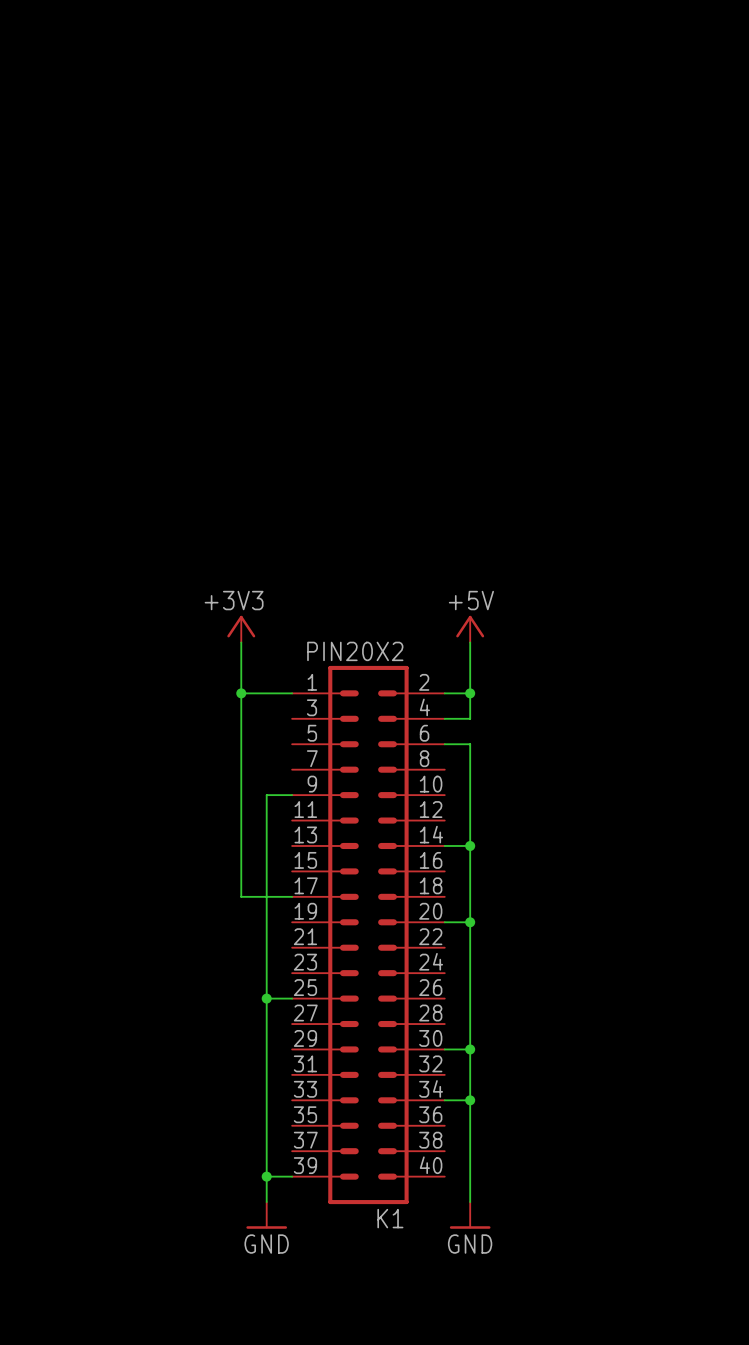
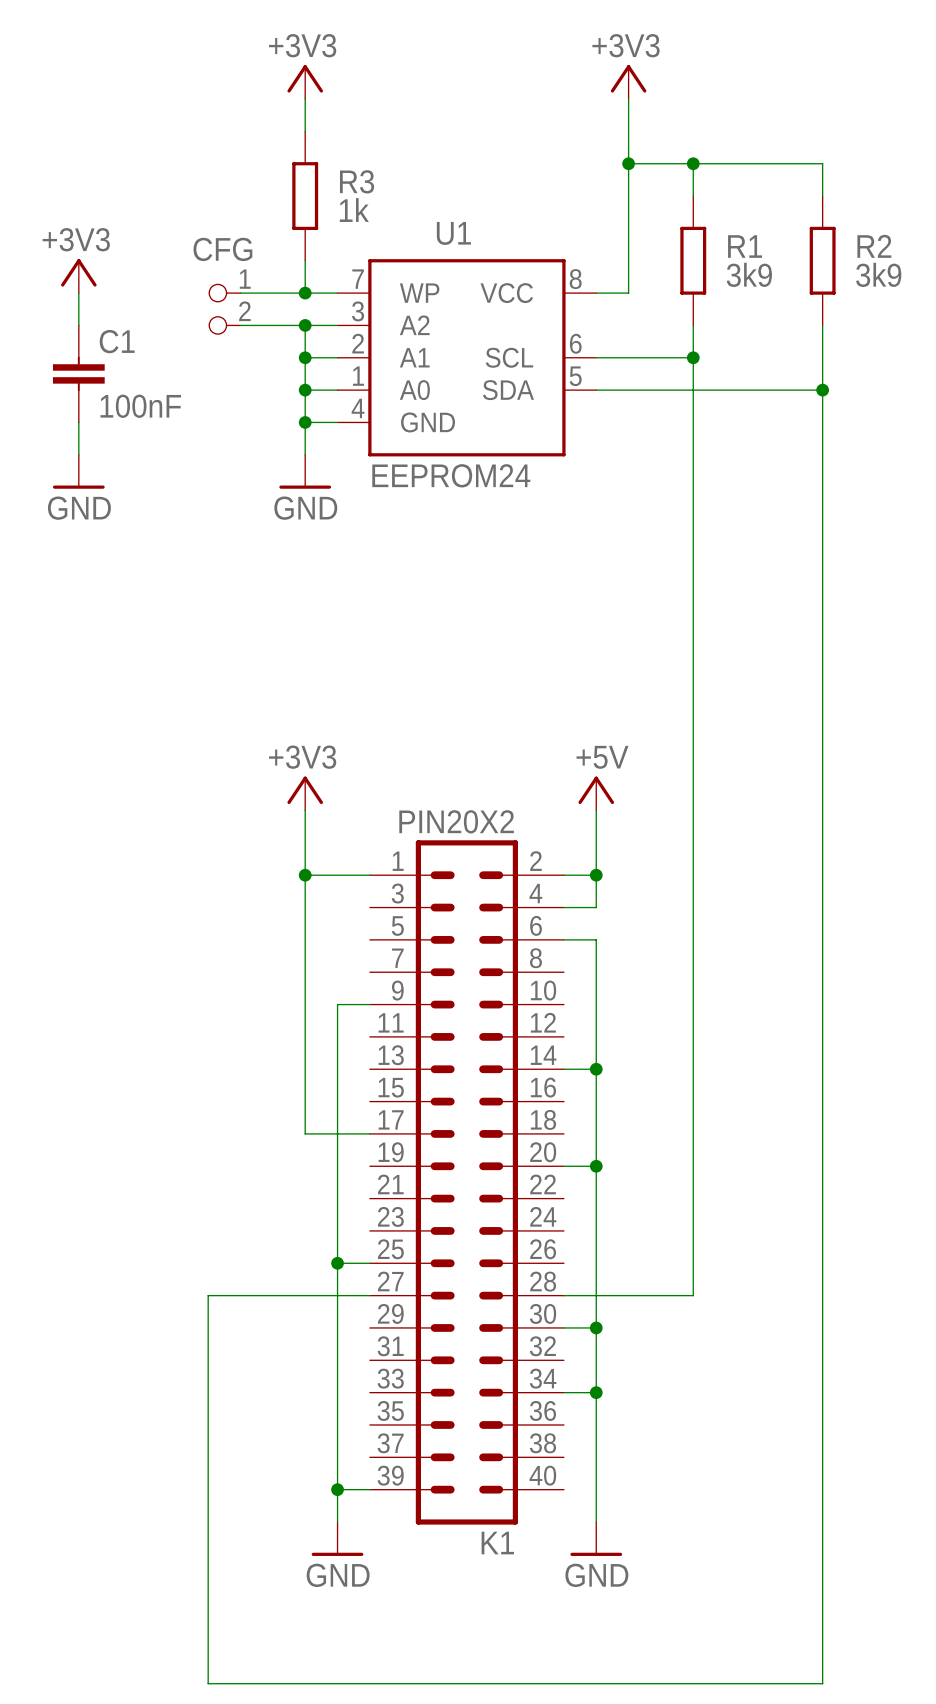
power symbol: none -> +3V3 (305, 82)
power symbol: none -> +3V3 (628, 82)
wire: none -> (305, 99) (305, 131)
wire: none -> (628, 99) (628, 293) (596, 293)
wire: none -> (628, 163) (822, 163) (822, 196)
junction: none -> (628, 163)
wire: none -> (693, 163) (693, 196)
junction: none -> (693, 163)
R3: none -> 1k (305, 196)
wire: none -> (305, 260) (305, 293)
R1: none -> 3k9 (693, 260)
R2: none -> 3k9 (822, 260)
power symbol: none -> +3V3 (78, 276)
wire: none -> (78, 293) (78, 325)
wire: none -> (240, 293) (337, 293)
junction: none -> (305, 293)
CFG: none -> (224, 309)
wire: none -> (240, 325) (337, 325)
wire: none -> (305, 325) (305, 454)
junction: none -> (305, 325)
wire: none -> (693, 325) (693, 1295) (563, 1295)
wire: none -> (822, 325) (822, 1683) (208, 1683) (208, 1295) (369, 1295)
wire: none -> (305, 357) (337, 357)
junction: none -> (305, 357)
U1: none -> EEPROM24 (466, 357)
wire: none -> (596, 357) (693, 357)
junction: none -> (693, 357)
C1: none -> 100nF (78, 373)
wire: none -> (305, 390) (337, 390)
junction: none -> (305, 390)
wire: none -> (596, 390) (822, 390)
junction: none -> (822, 390)
wire: none -> (78, 422) (78, 454)
wire: none -> (305, 422) (337, 422)
junction: none -> (305, 422)
power symbol: none -> GND (78, 471)
power symbol: none -> GND (305, 471)

